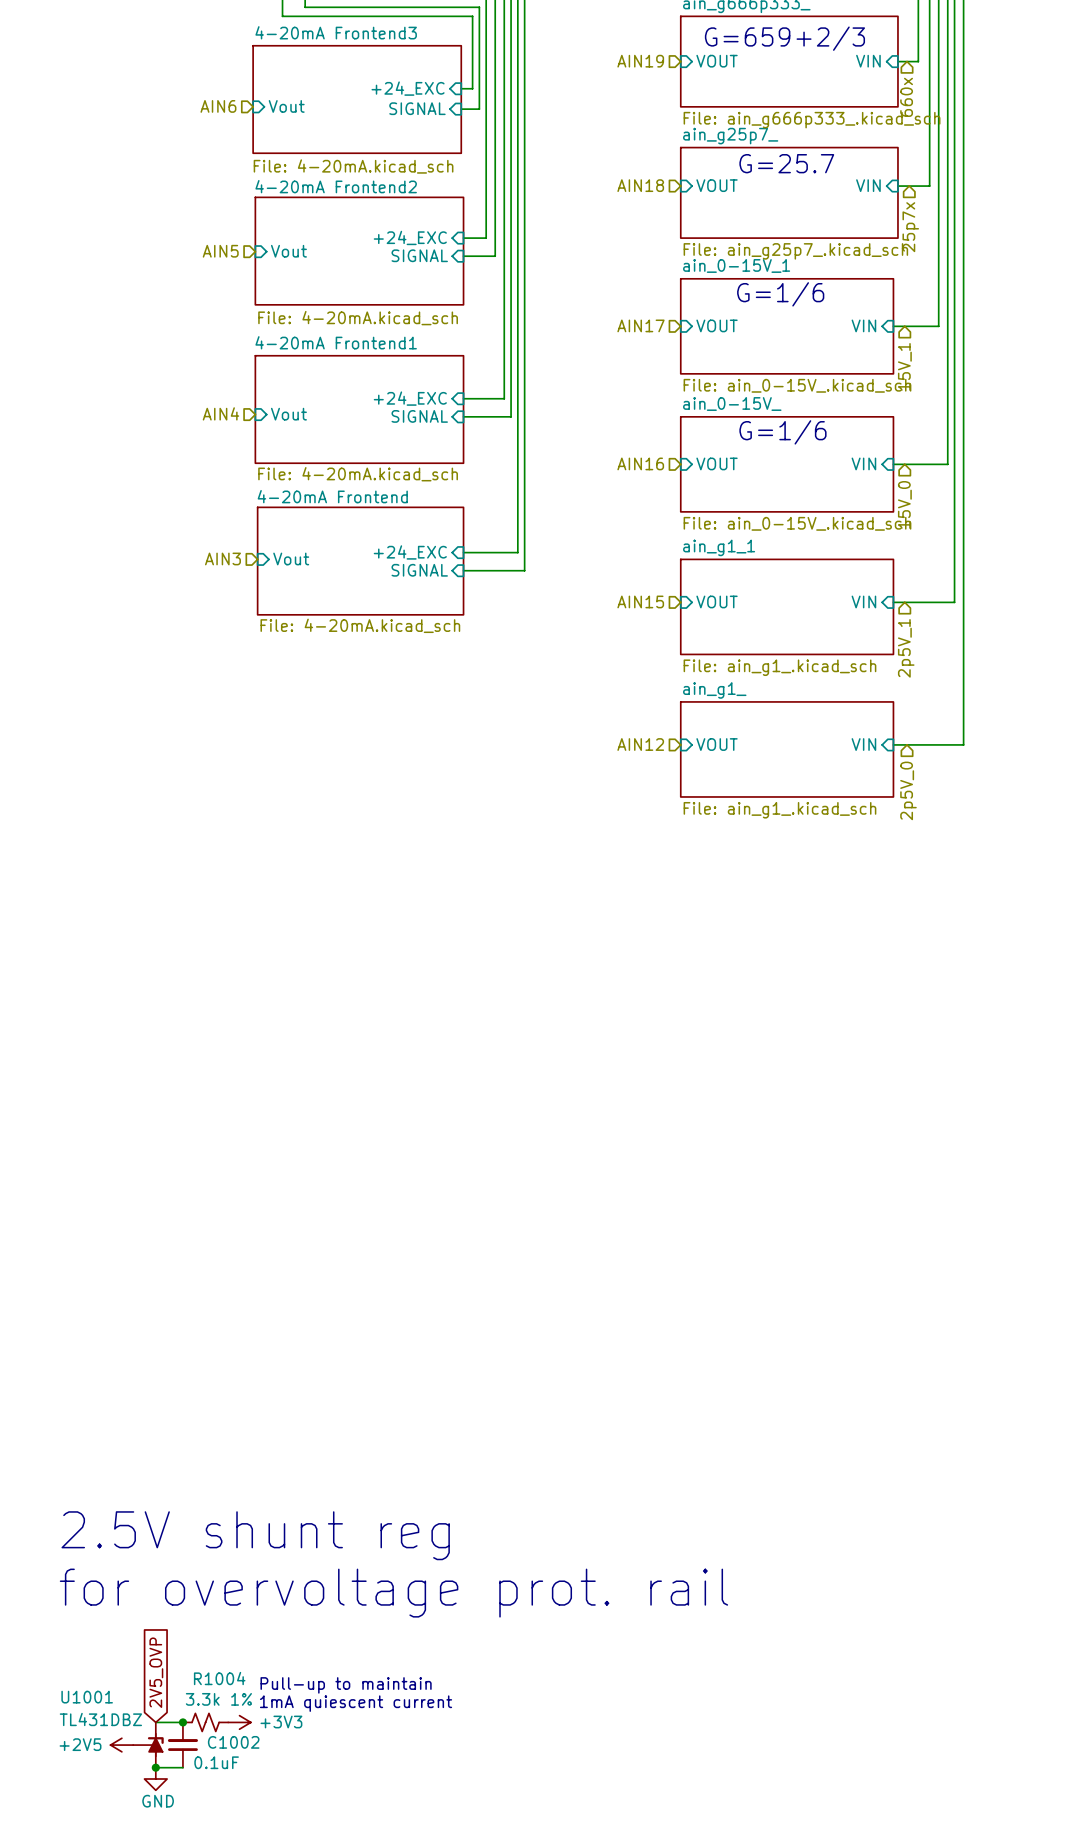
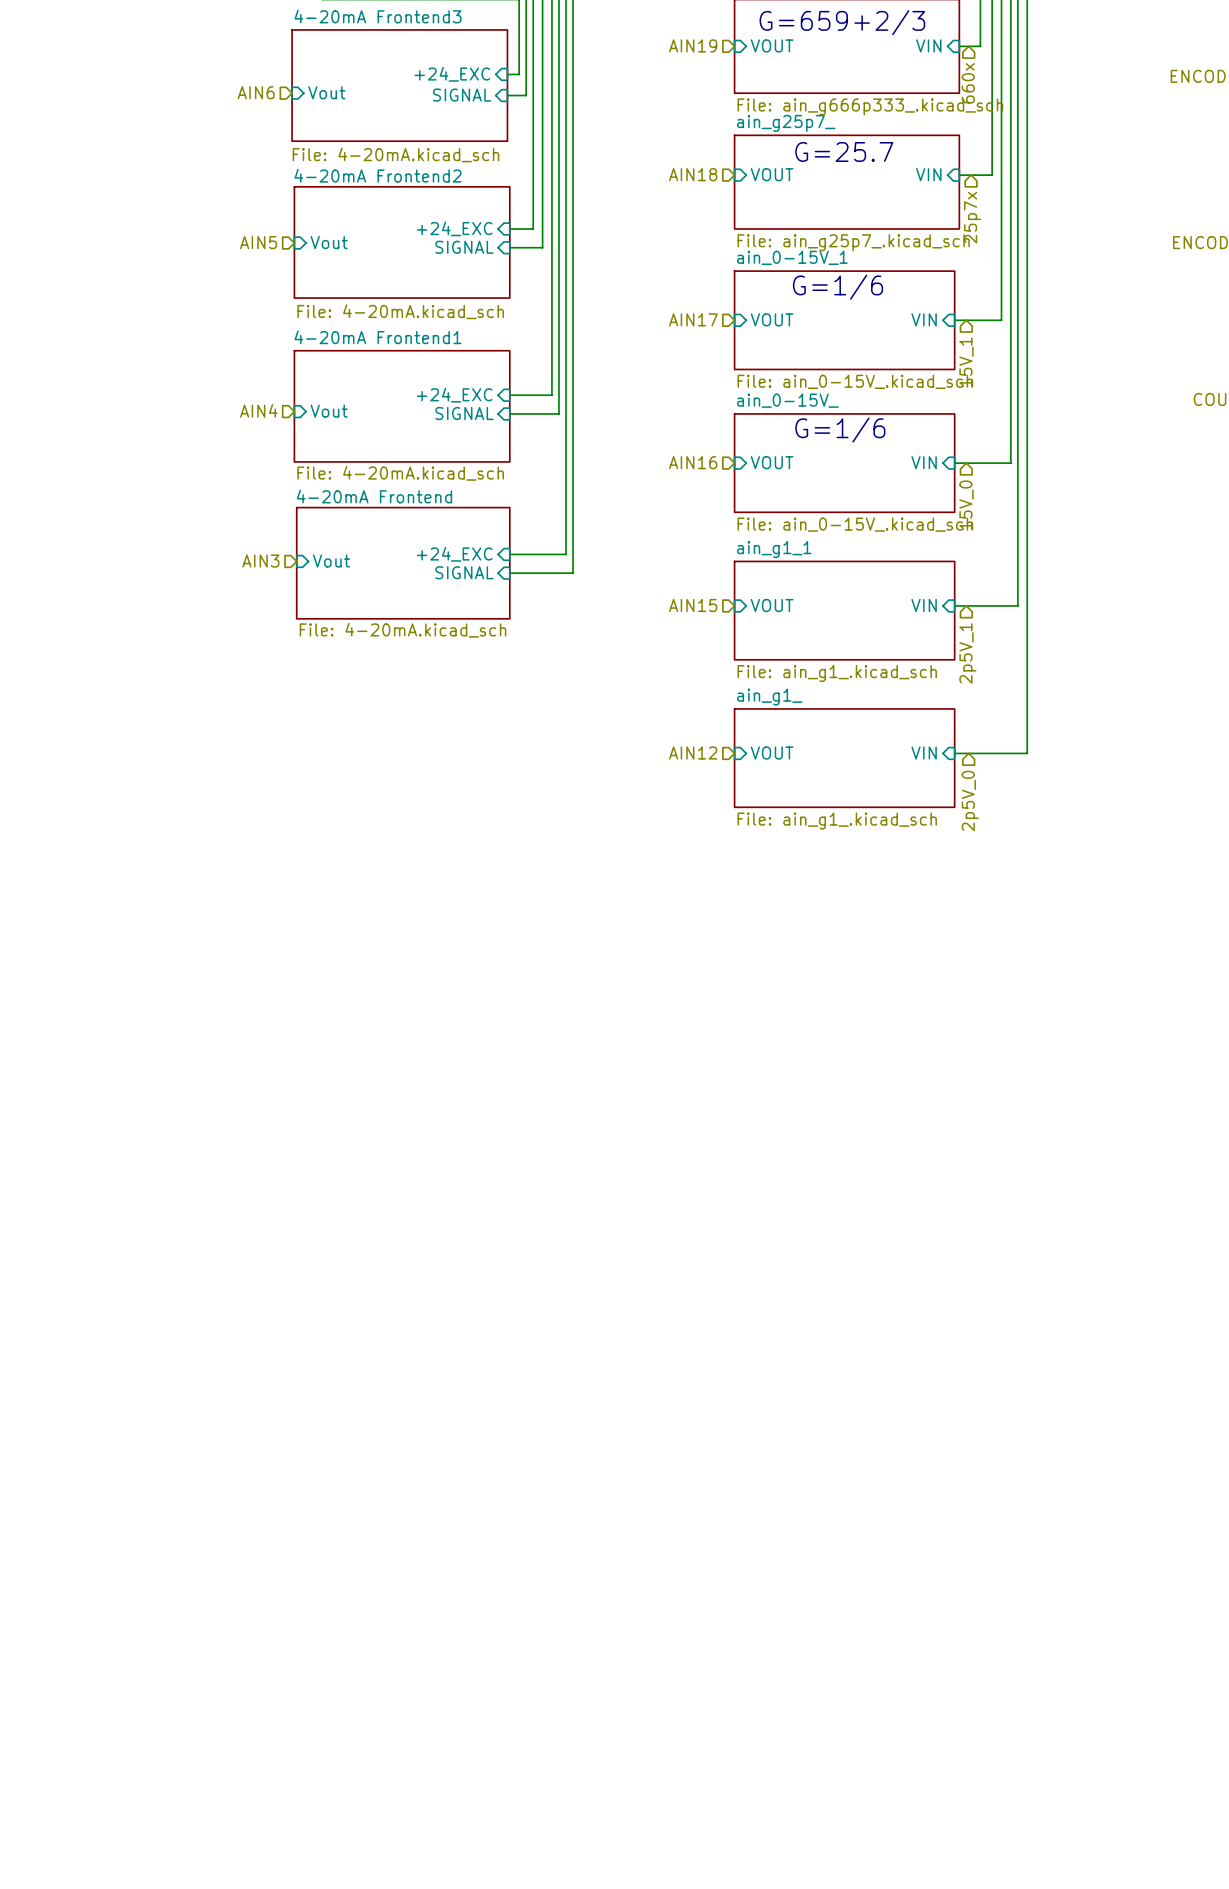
text: 2.5V shunt reg (255, 1535) -> none
text: for overvoltage prot. rail (393, 1593) -> none
global label: 2V5_OVP (156, 1672) -> none
text: Pull-up to maintain (346, 1685) -> none
text: 1mA quiescent current (356, 1703) -> none
wire: (155, 1722) (182, 1722) -> none
junction: (182, 1722) -> none
R1004: 3.3k 1% (205, 1722) -> none
power symbol: +3V3 (239, 1722) -> none
power symbol: +2V5 (121, 1745) -> none
U1001: TL431DBZ (148, 1745) -> none
C1002: 0.1uF (182, 1745) -> none
wire: (155, 1767) (182, 1767) -> none
junction: (155, 1767) -> none
power symbol: GND (155, 1779) -> none

